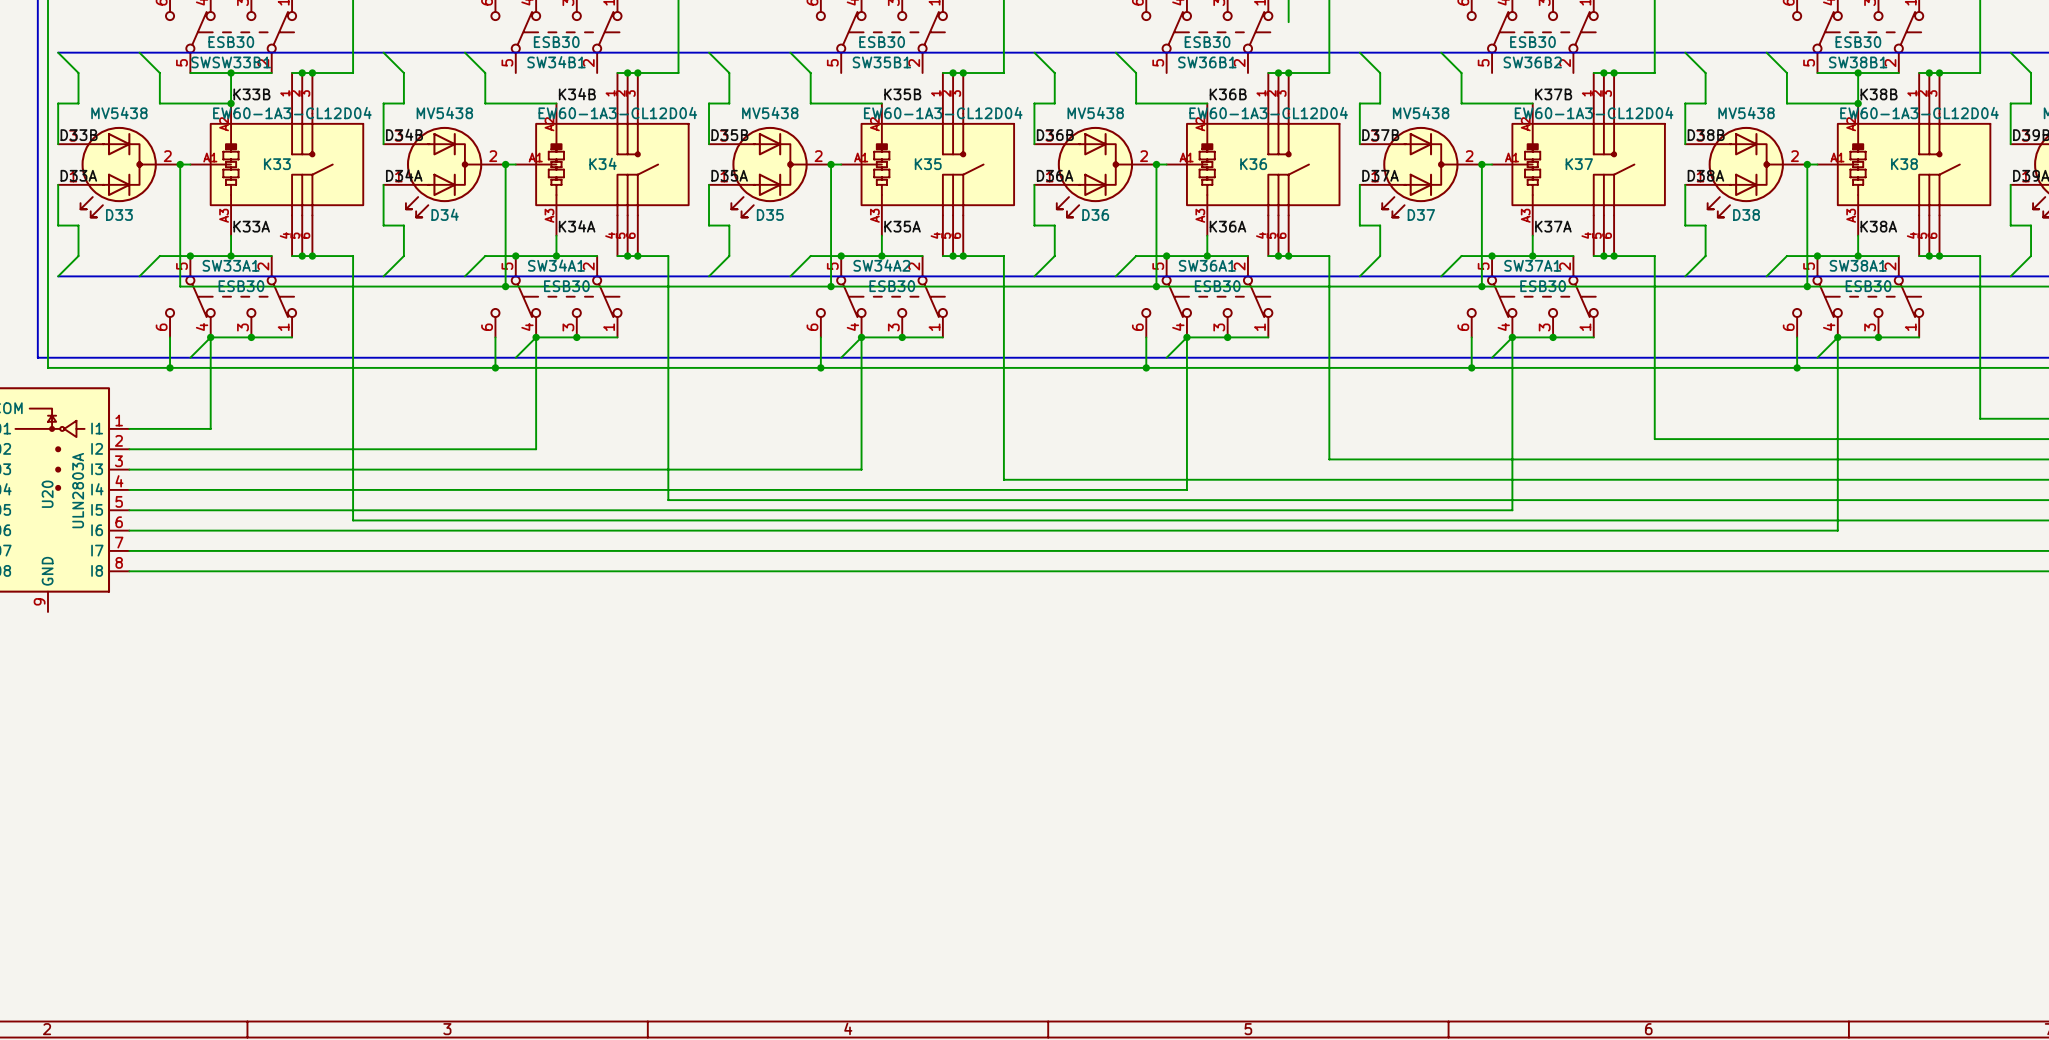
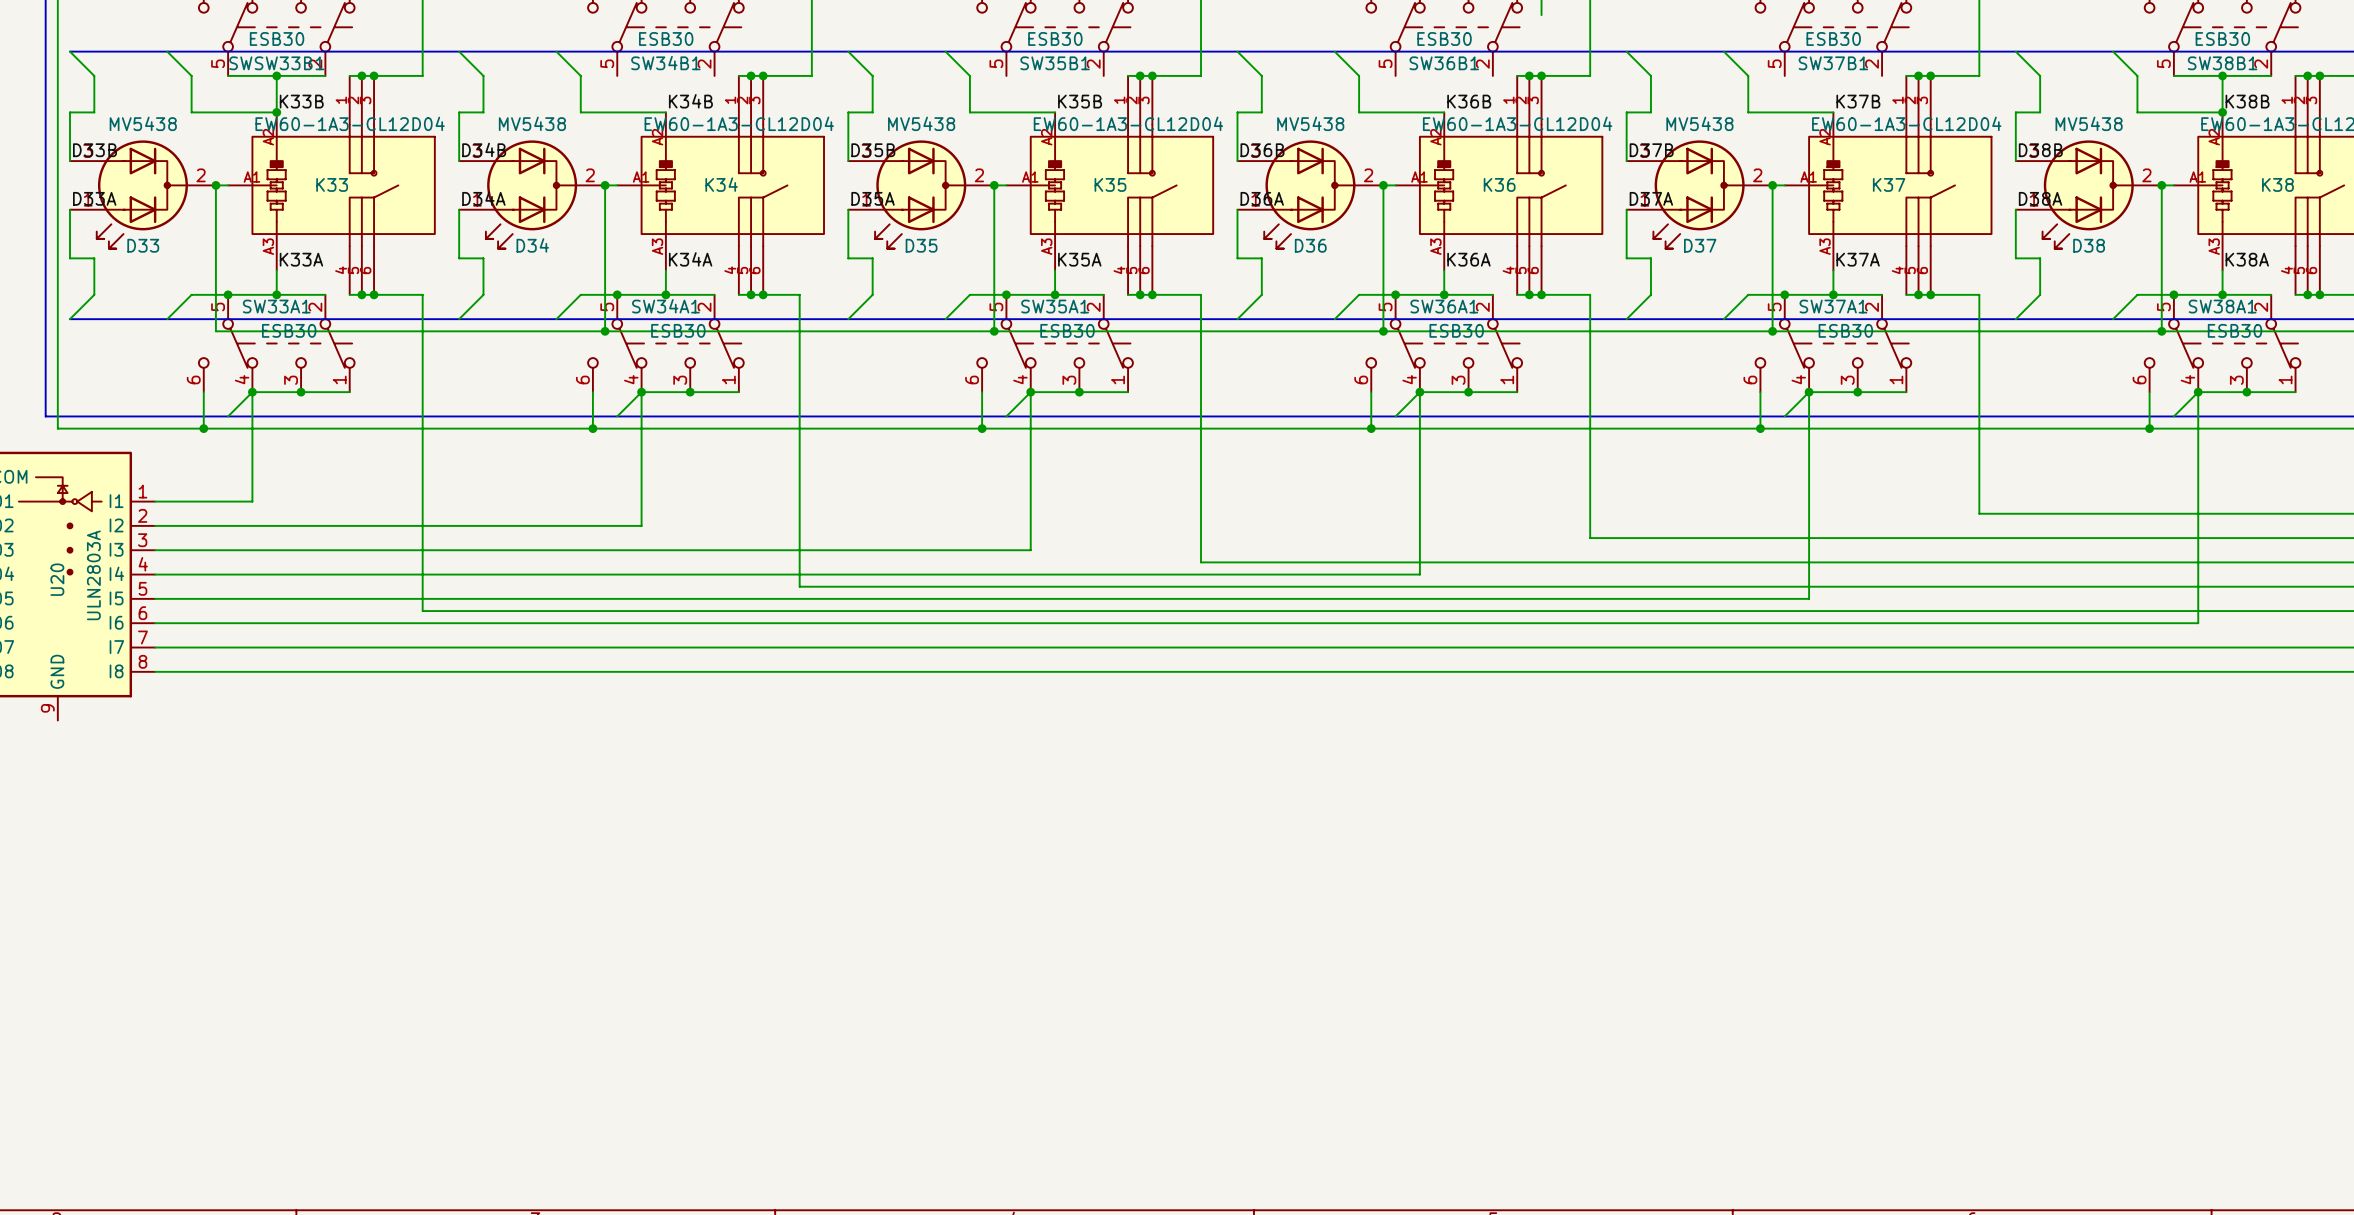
SW36B2 name: SW36B2 (1532, 62) -> SW37B1 (1833, 63)
SW34A2 name: SW34A2 (881, 265) -> SW35A1 (1055, 306)

